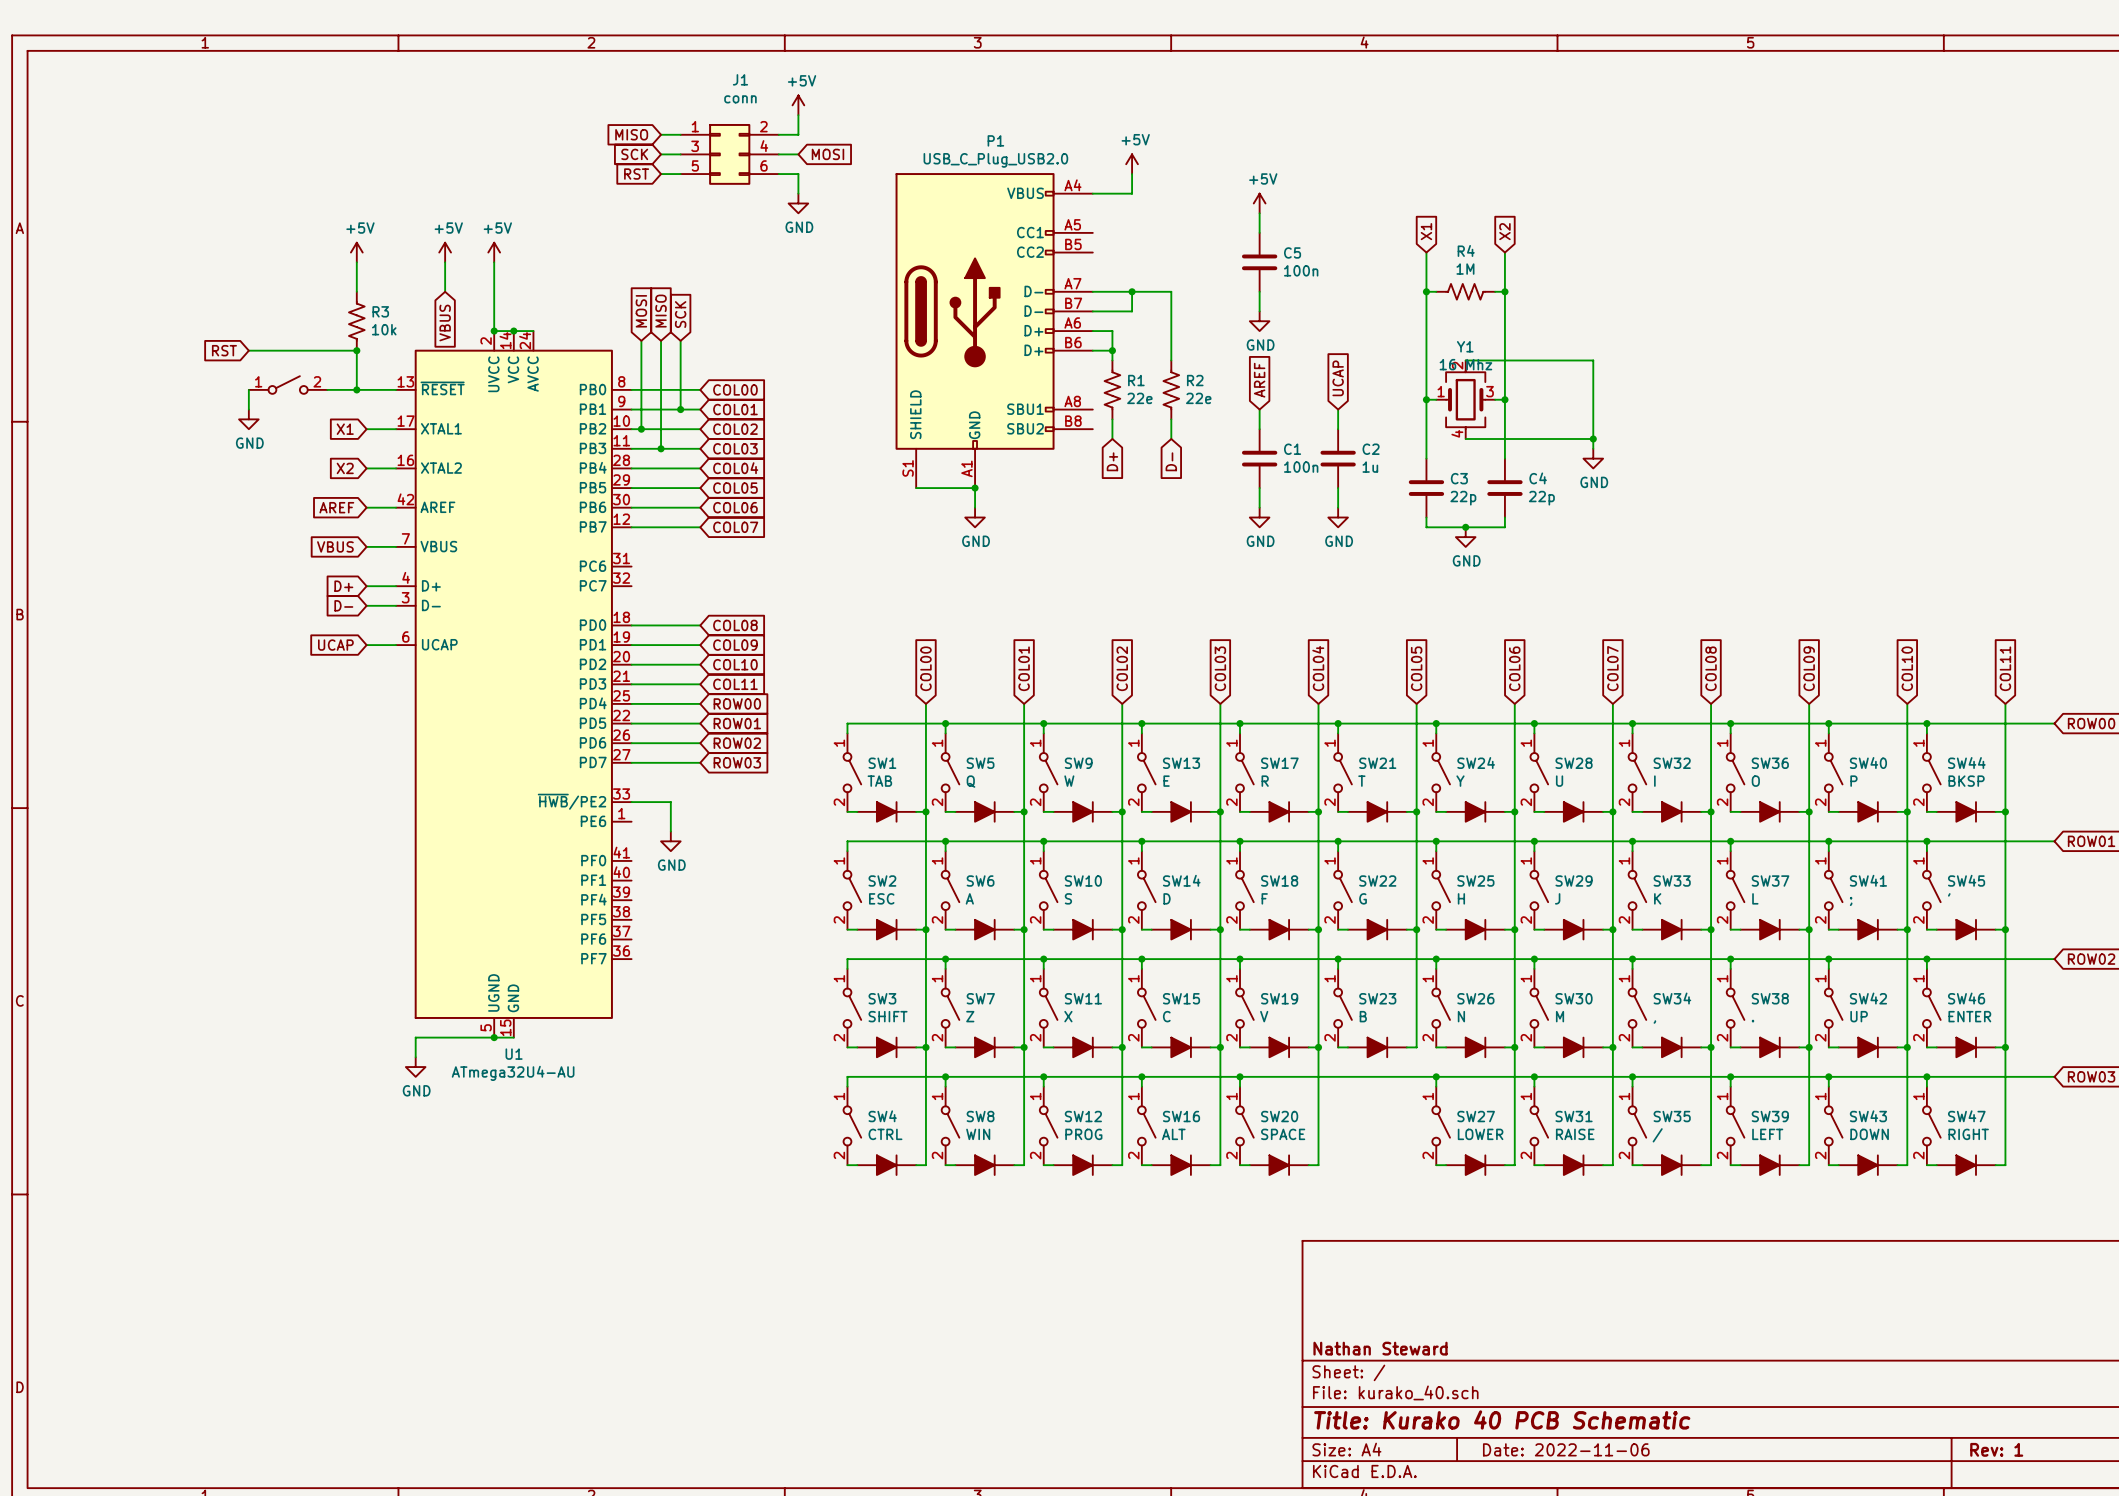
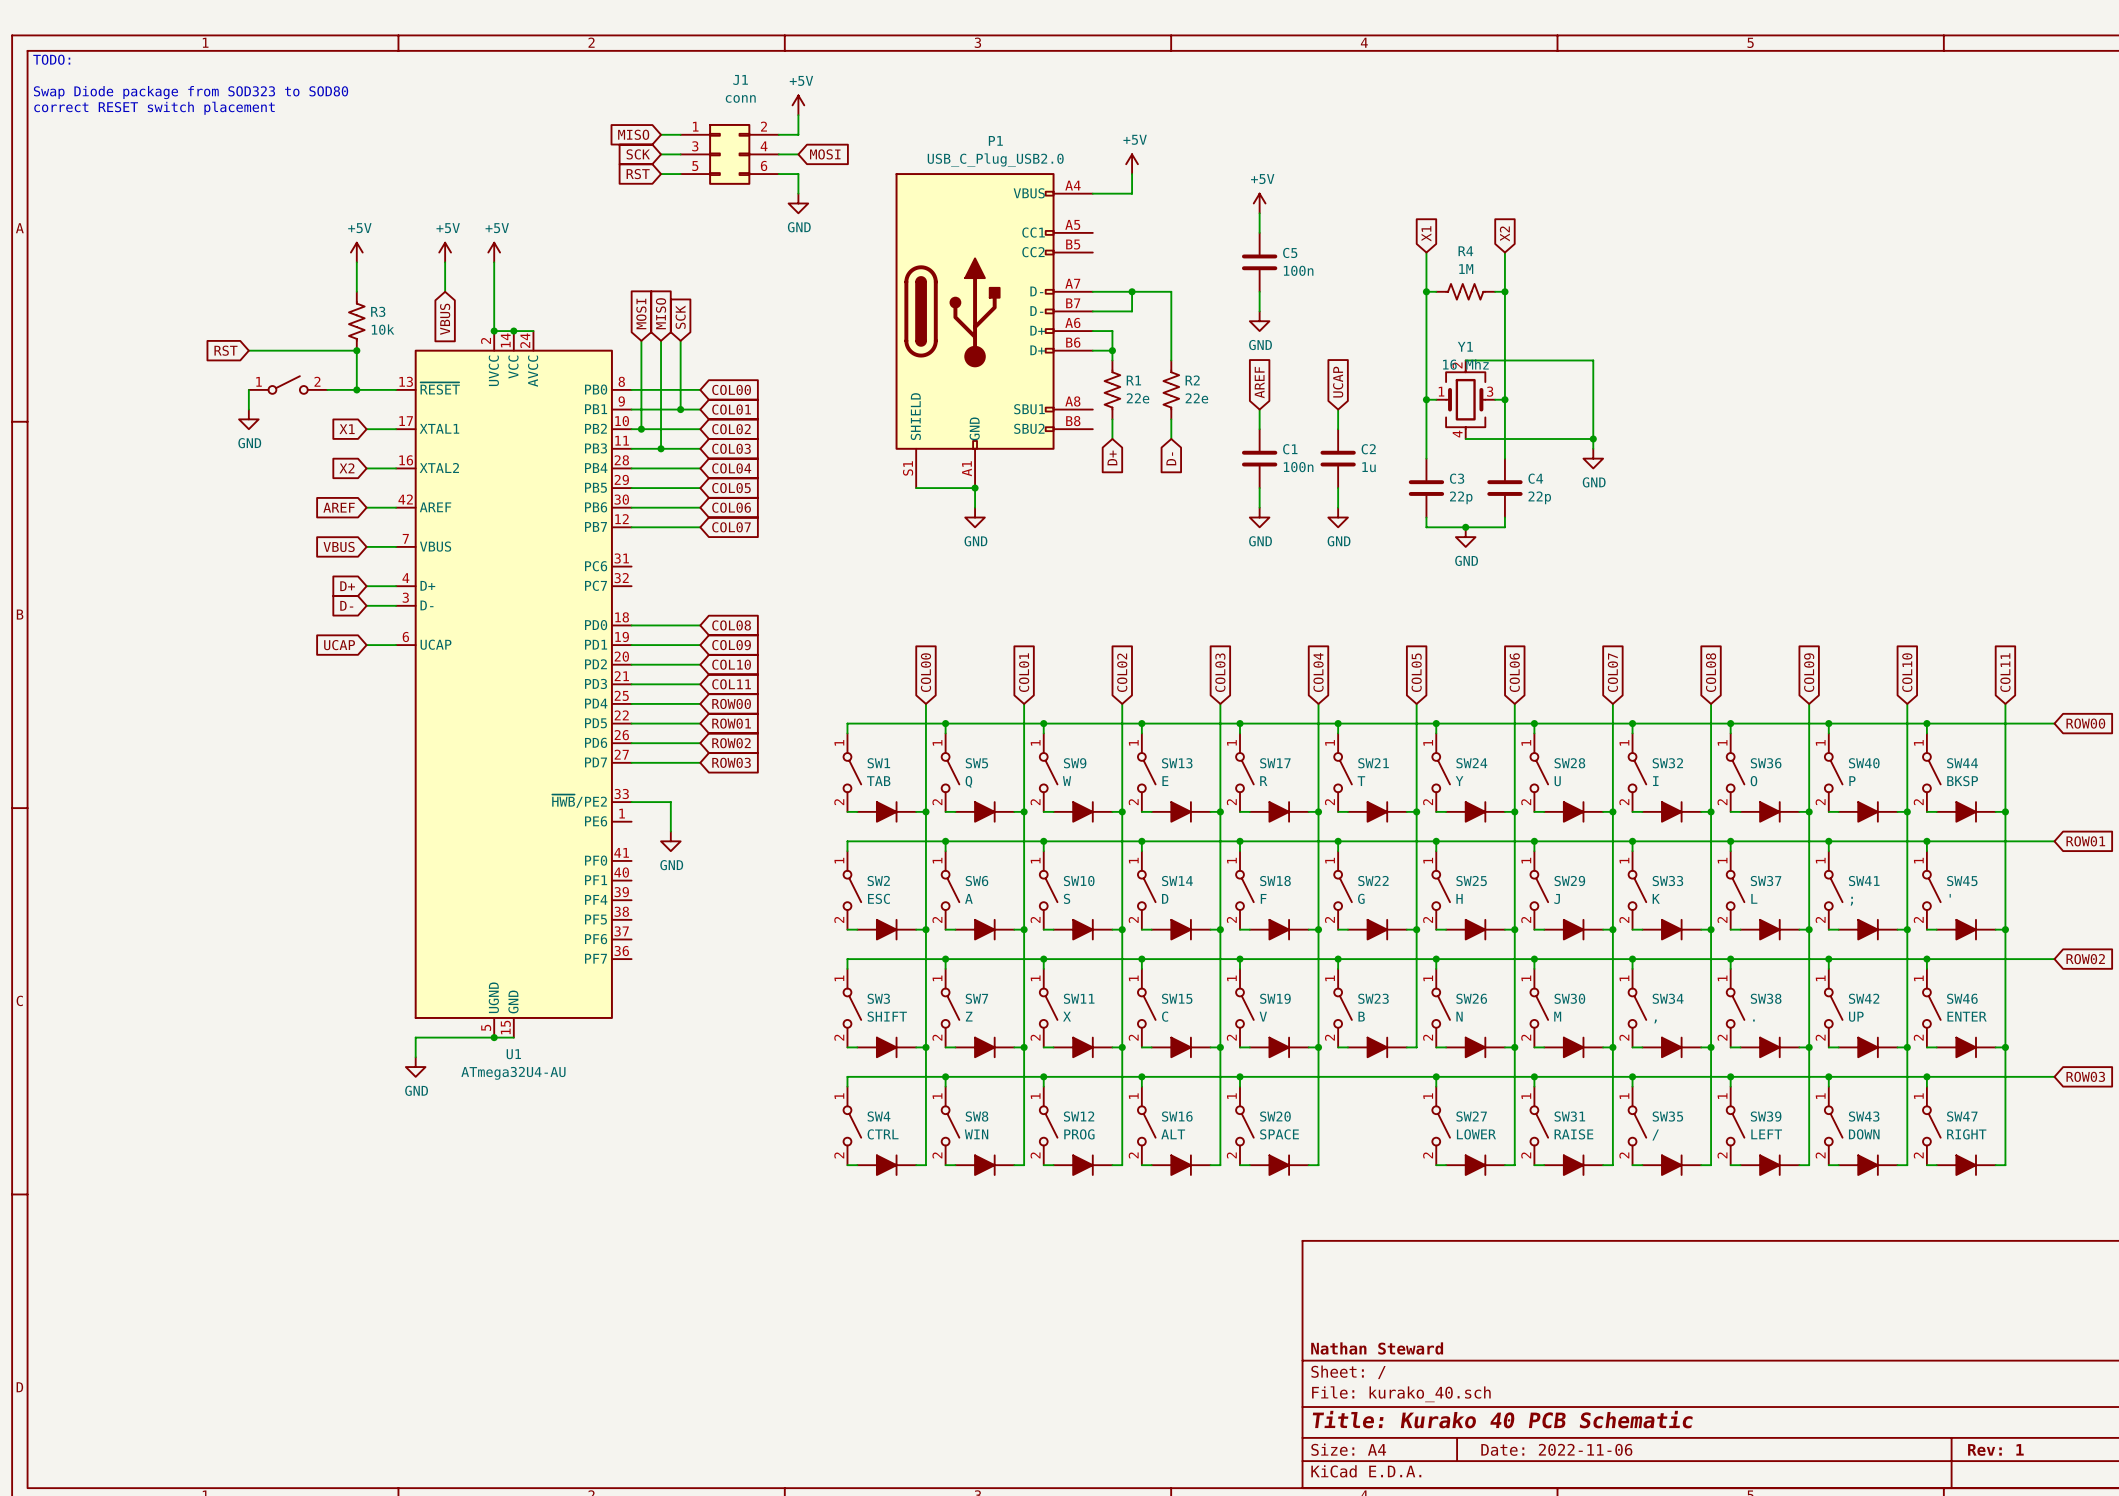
text: none -> TODO: (51, 59)
text: none -> Swap Diode package from SOD323 to SOD80 (191, 92)
text: none -> correct RESET switch placement (154, 108)

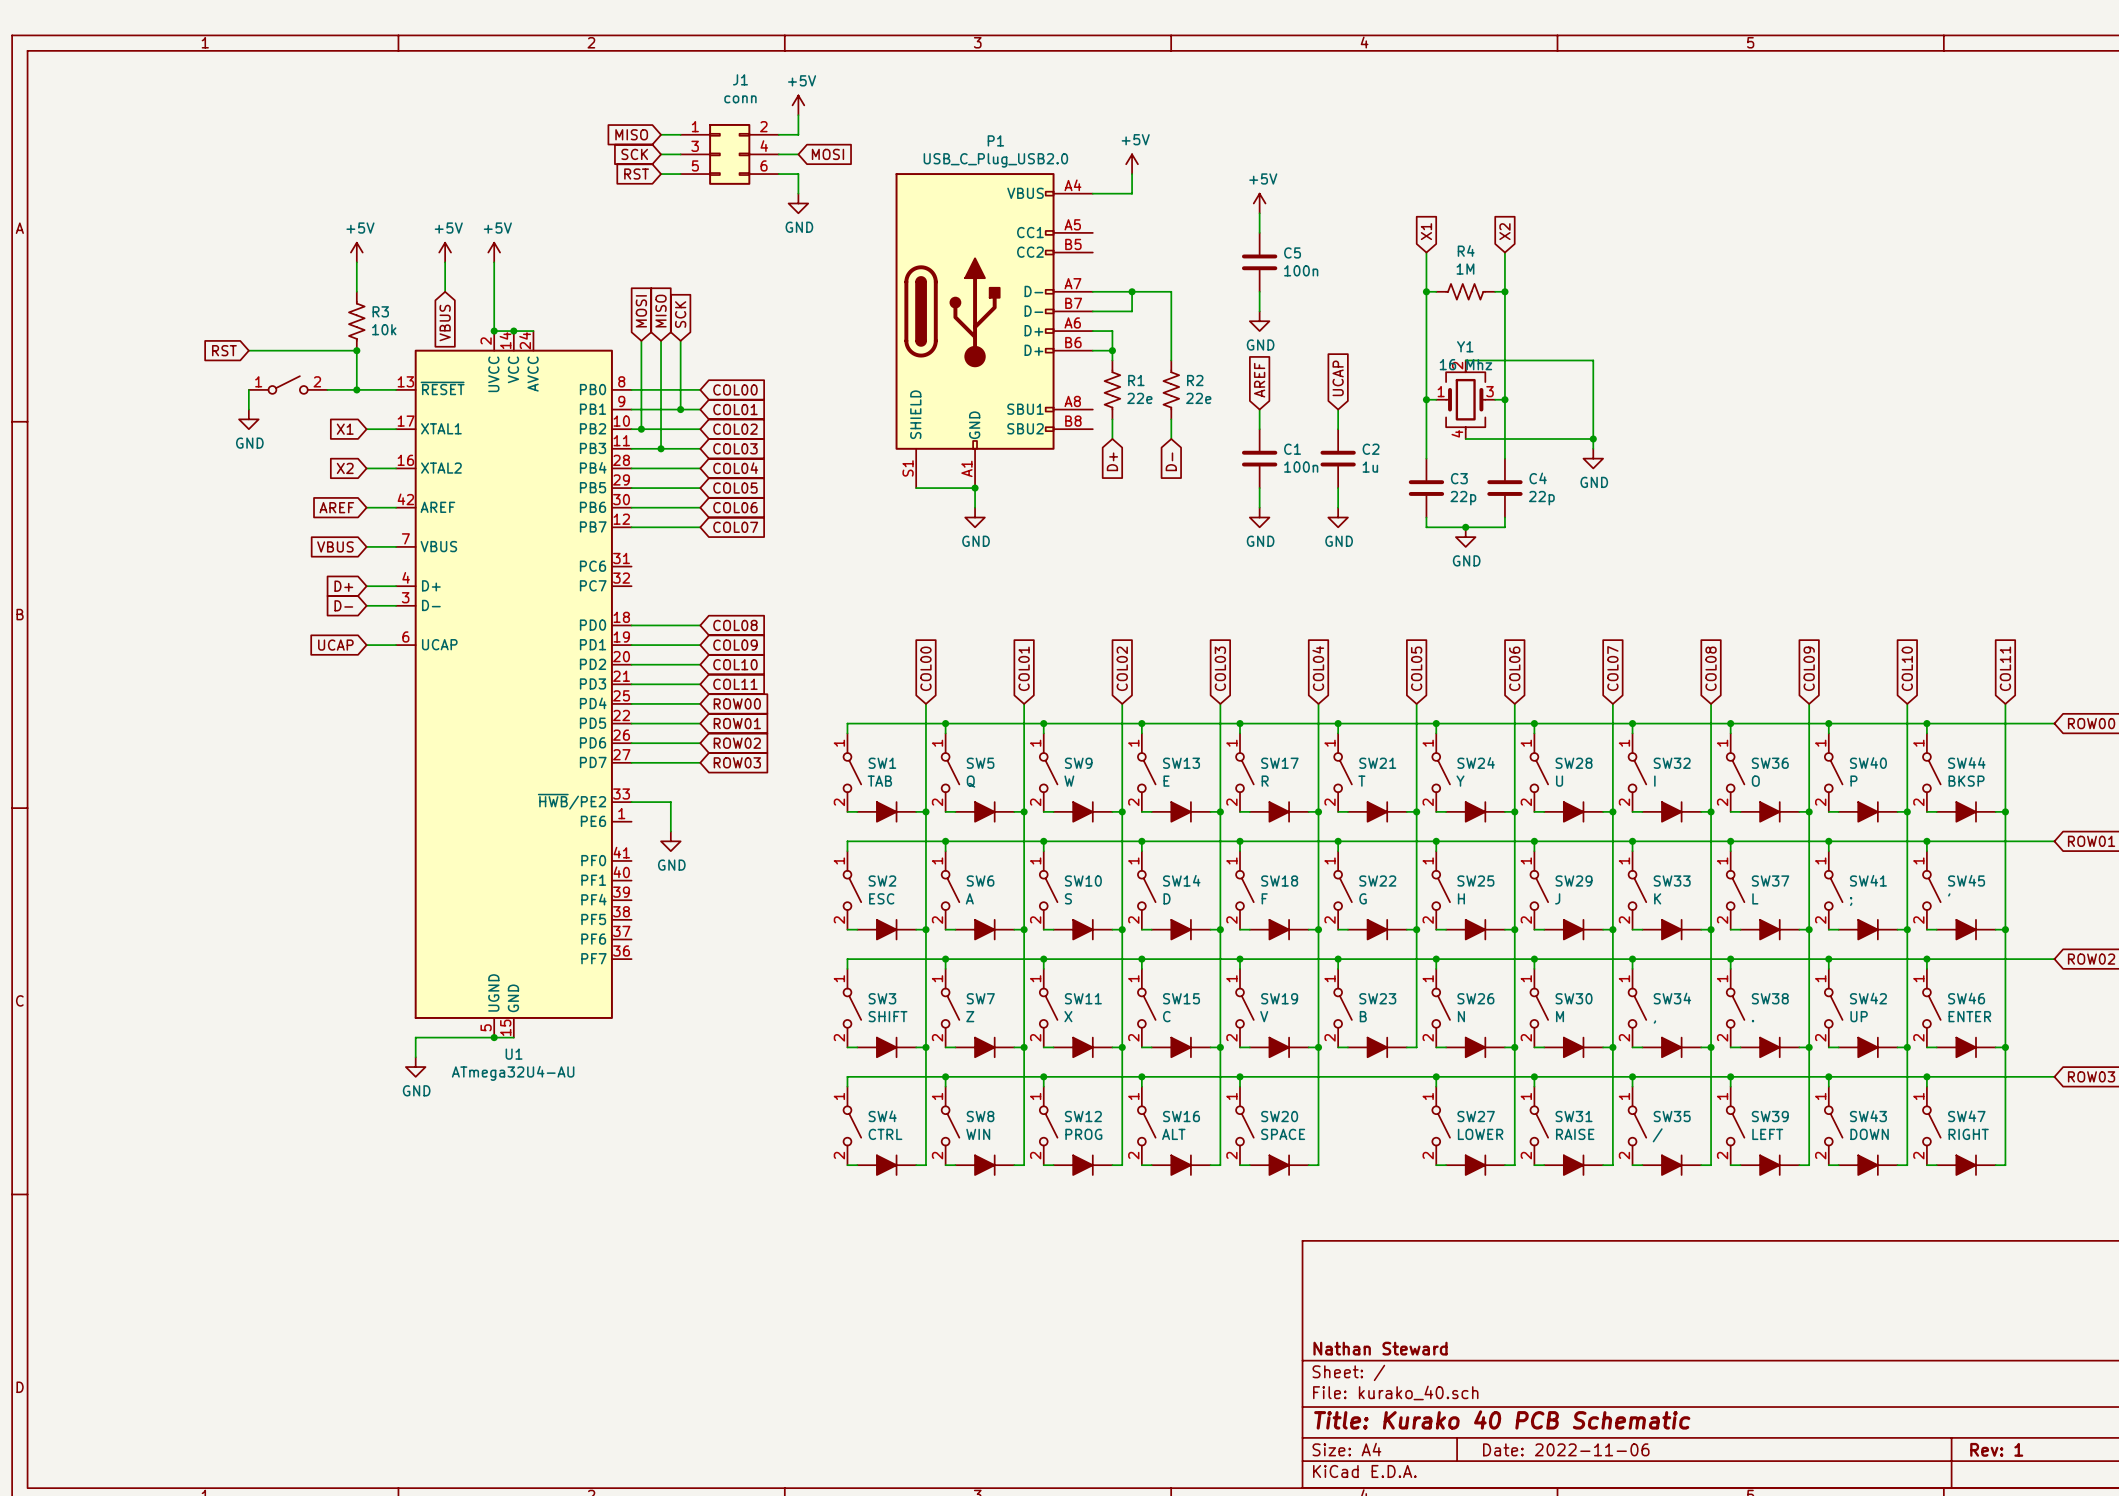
text: TODO: (51, 59) -> none
text: Swap Diode package from SOD323 to SOD80 (191, 92) -> none
text: correct RESET switch placement (154, 108) -> none

